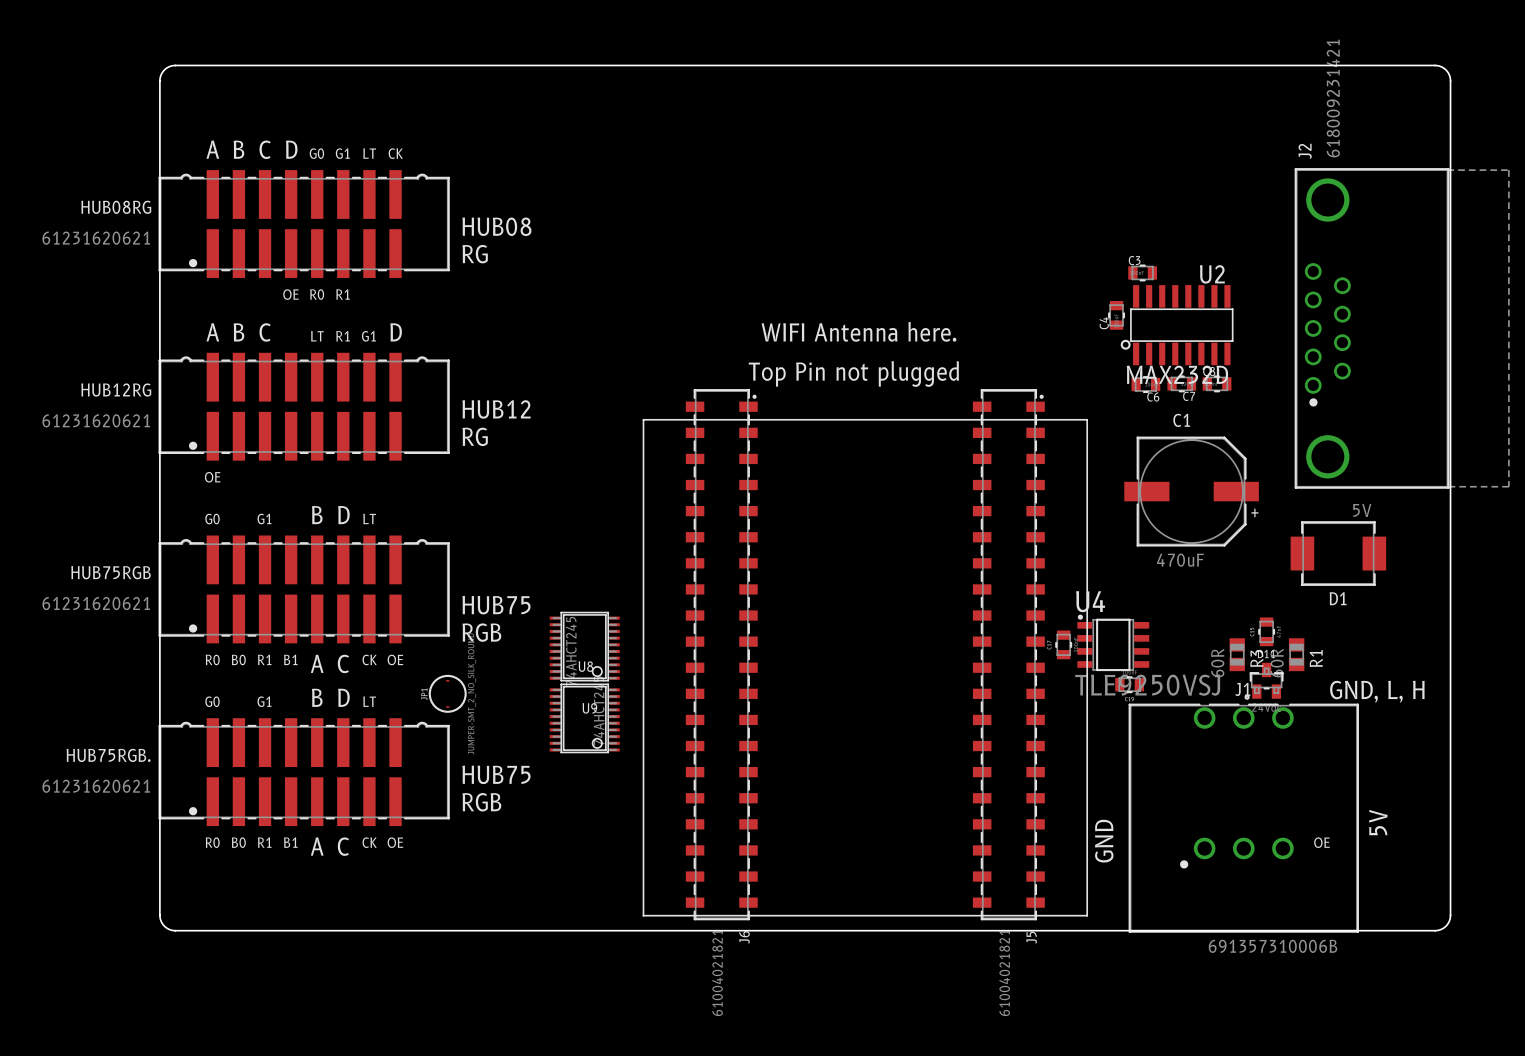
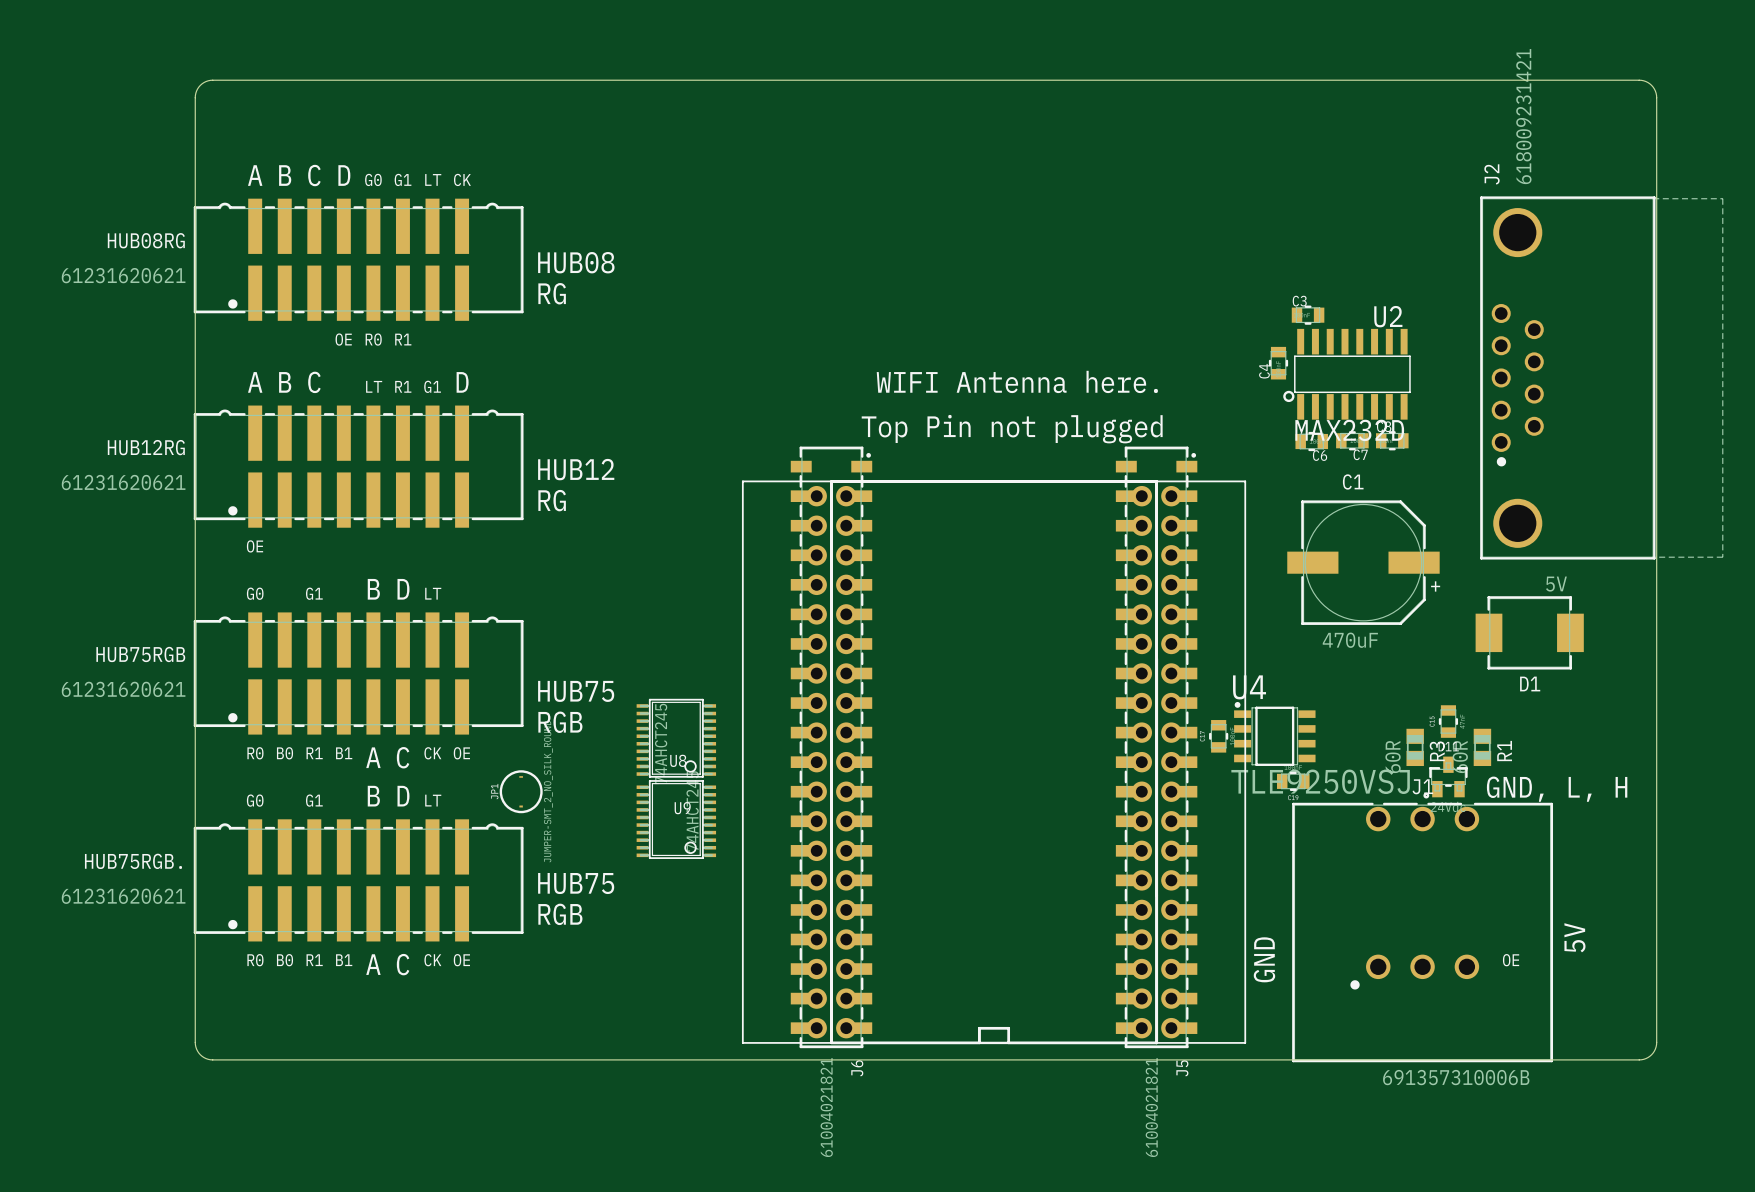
part: none -> (982, 762)
part: none -> (1005, 762)

